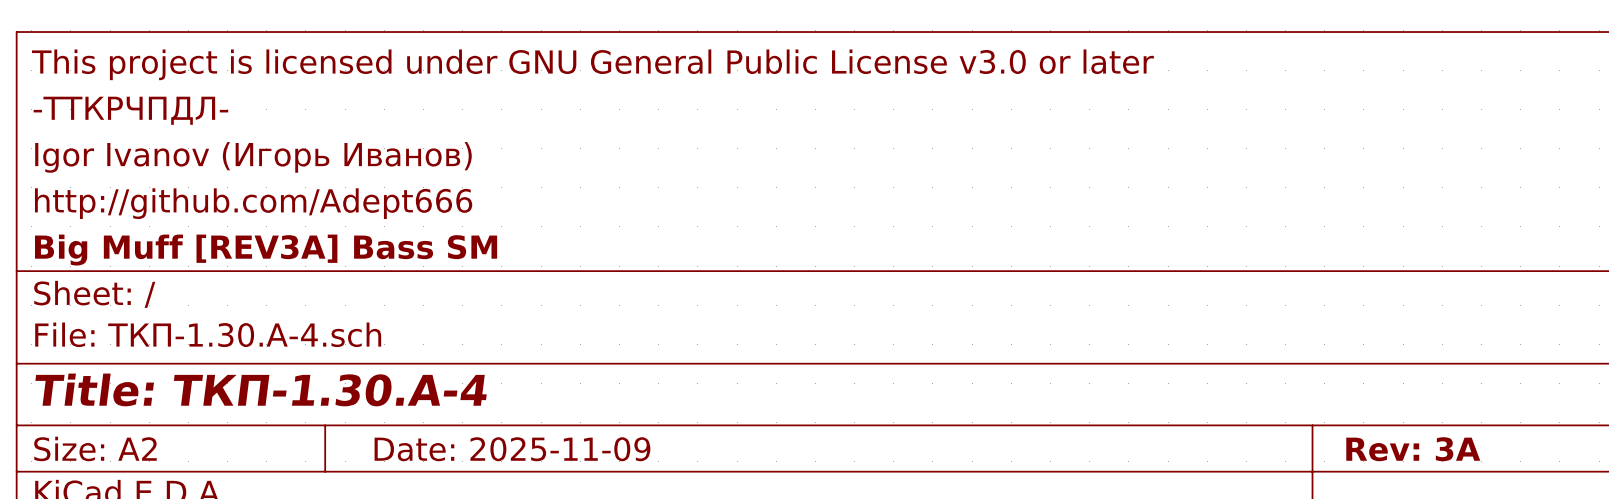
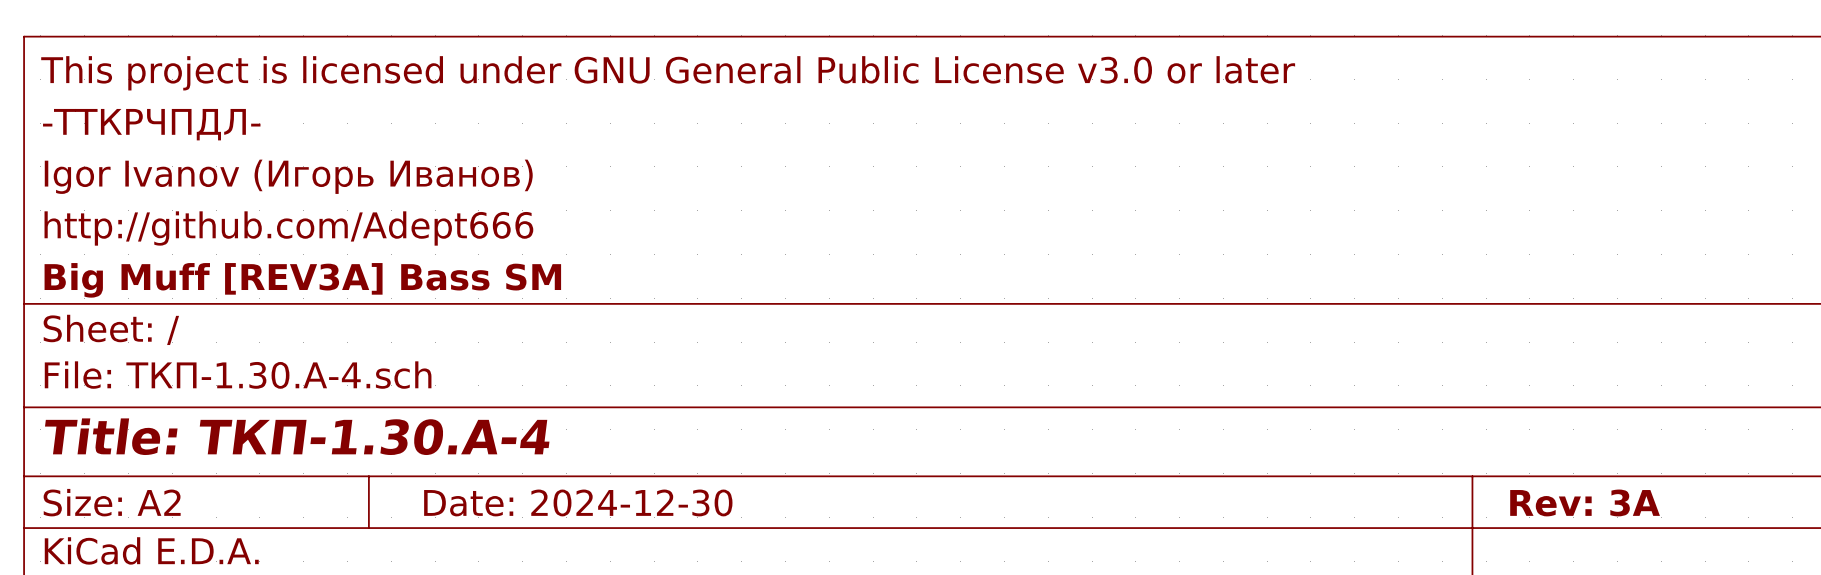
title block: Date: 2025-11-09 (512, 449) -> Date: 2024-12-30 (578, 502)

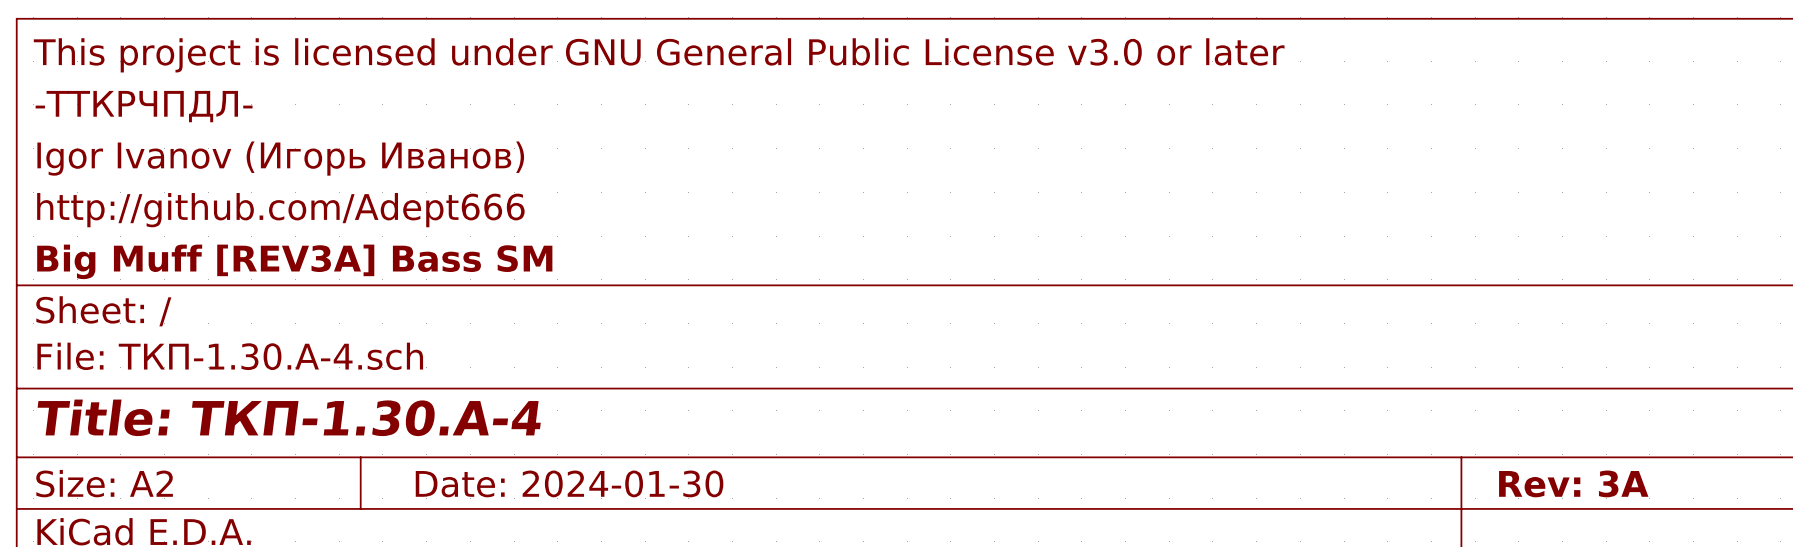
title block: Date: 2024-12-30 (578, 502) -> Date: 2024-01-30 (569, 483)

